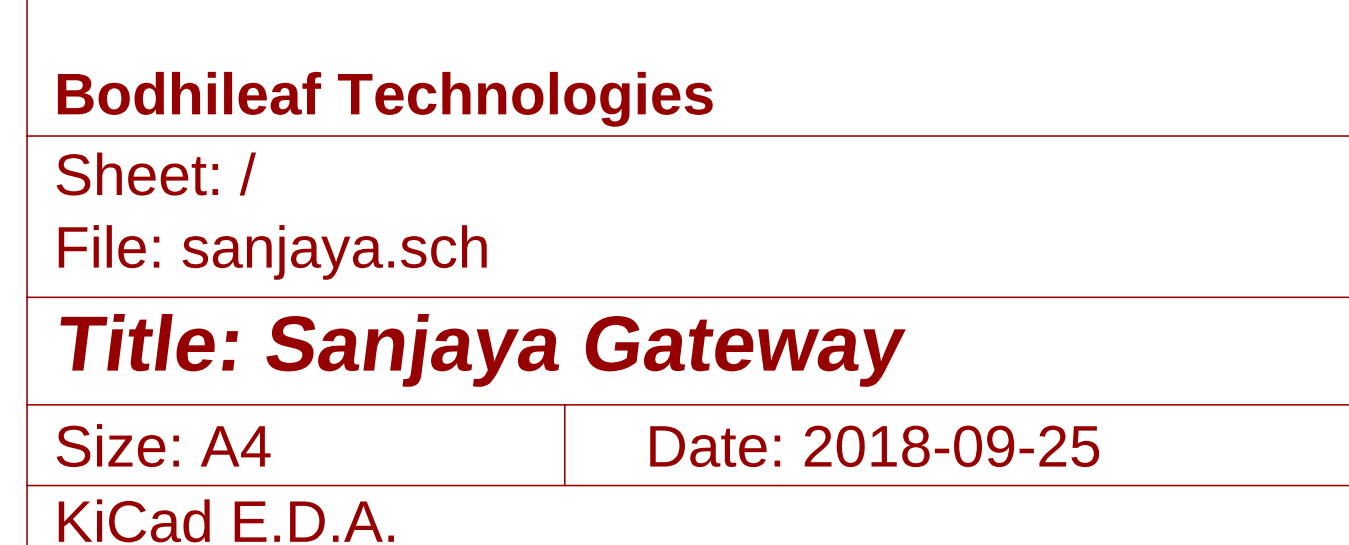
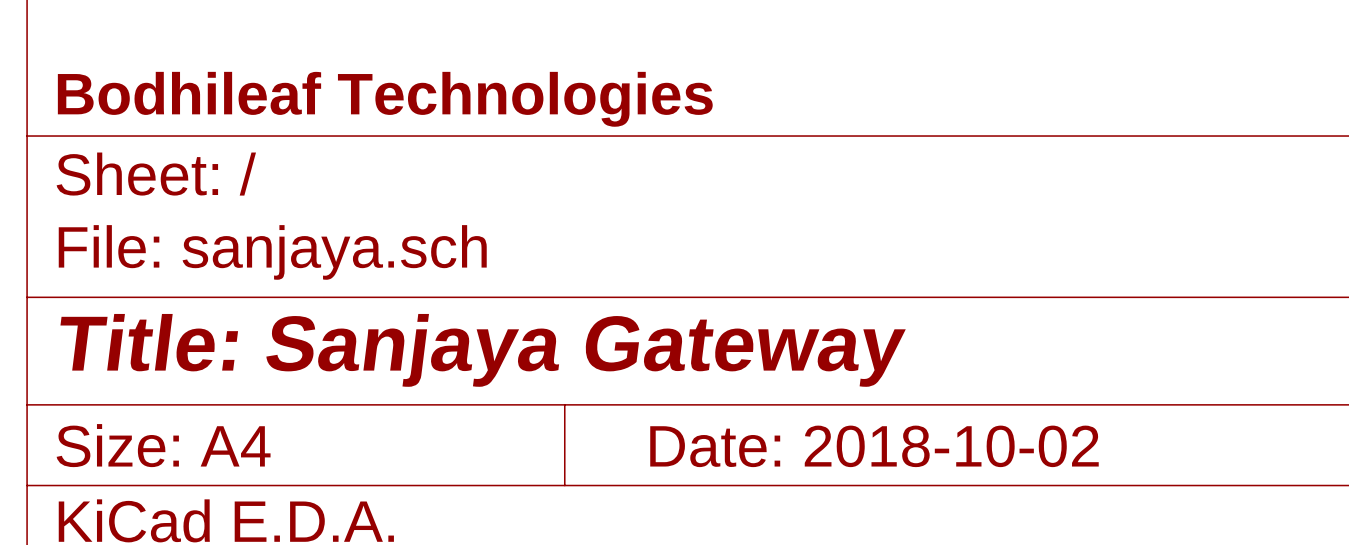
title block: Date: 2018-09-25 (874, 446) -> Date: 2018-10-02 (874, 446)

